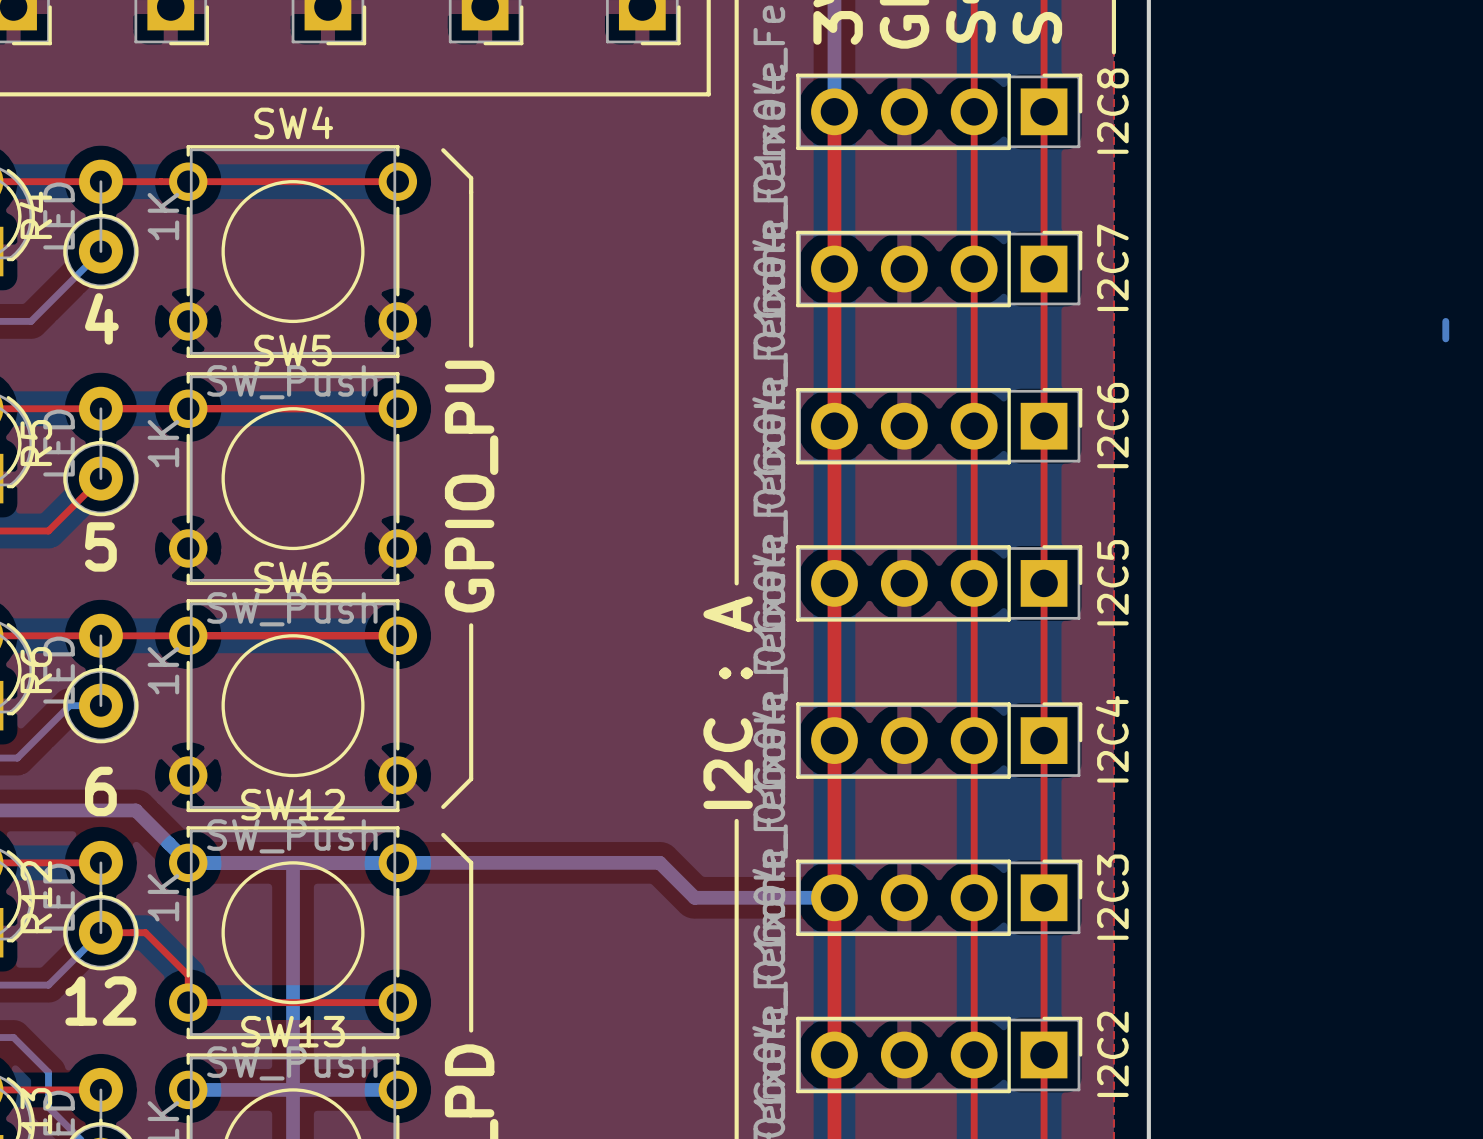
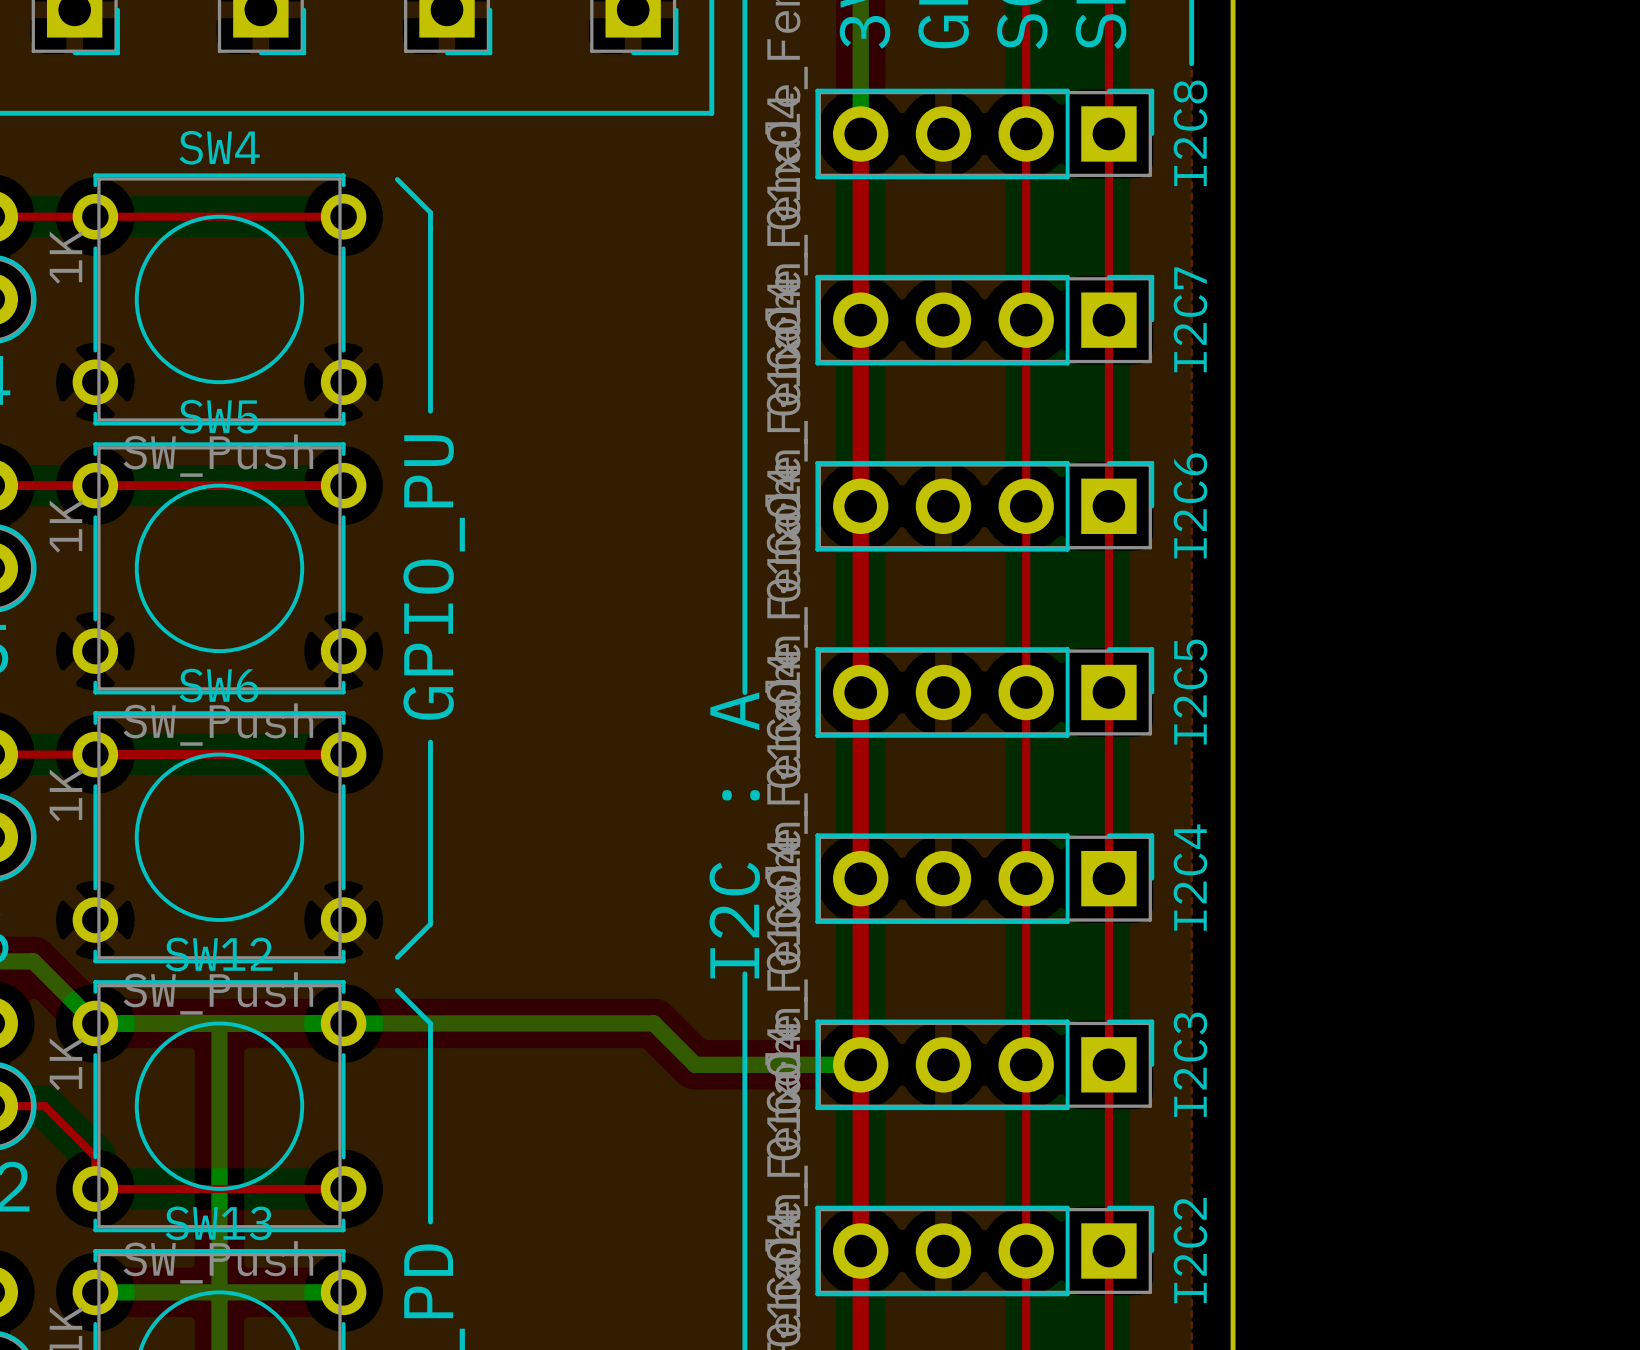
bottom track: (1445, 321) (1445, 338) -> none

